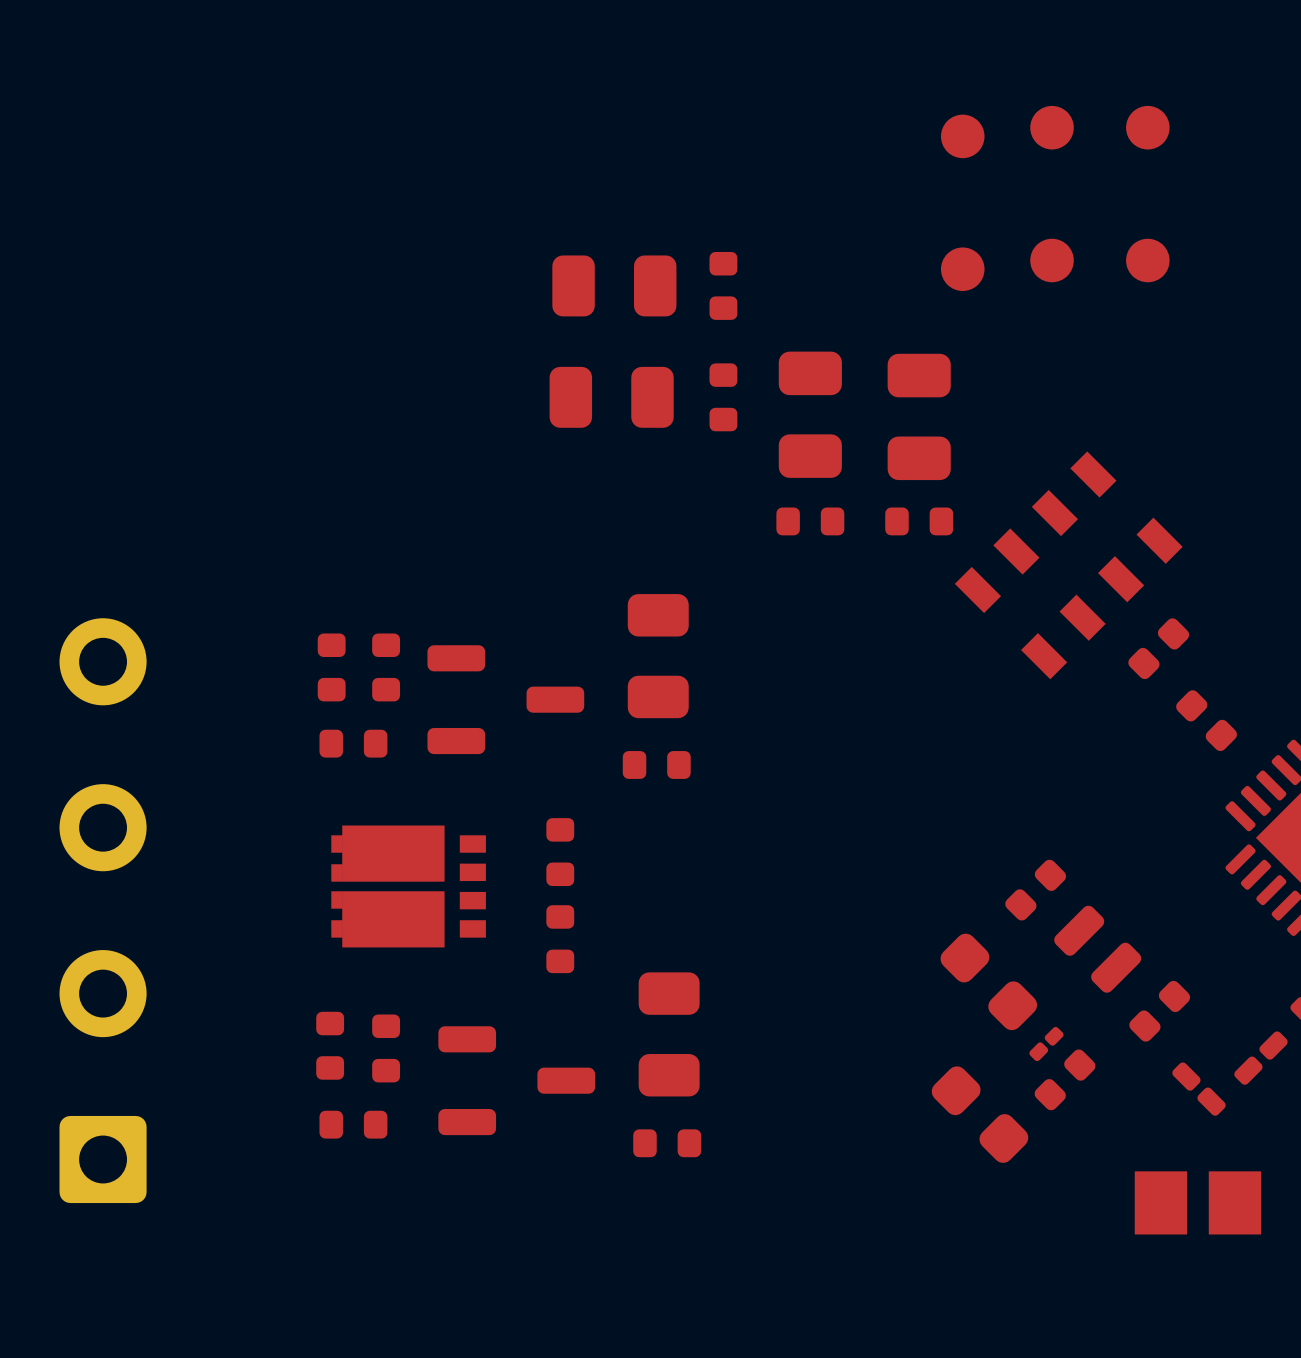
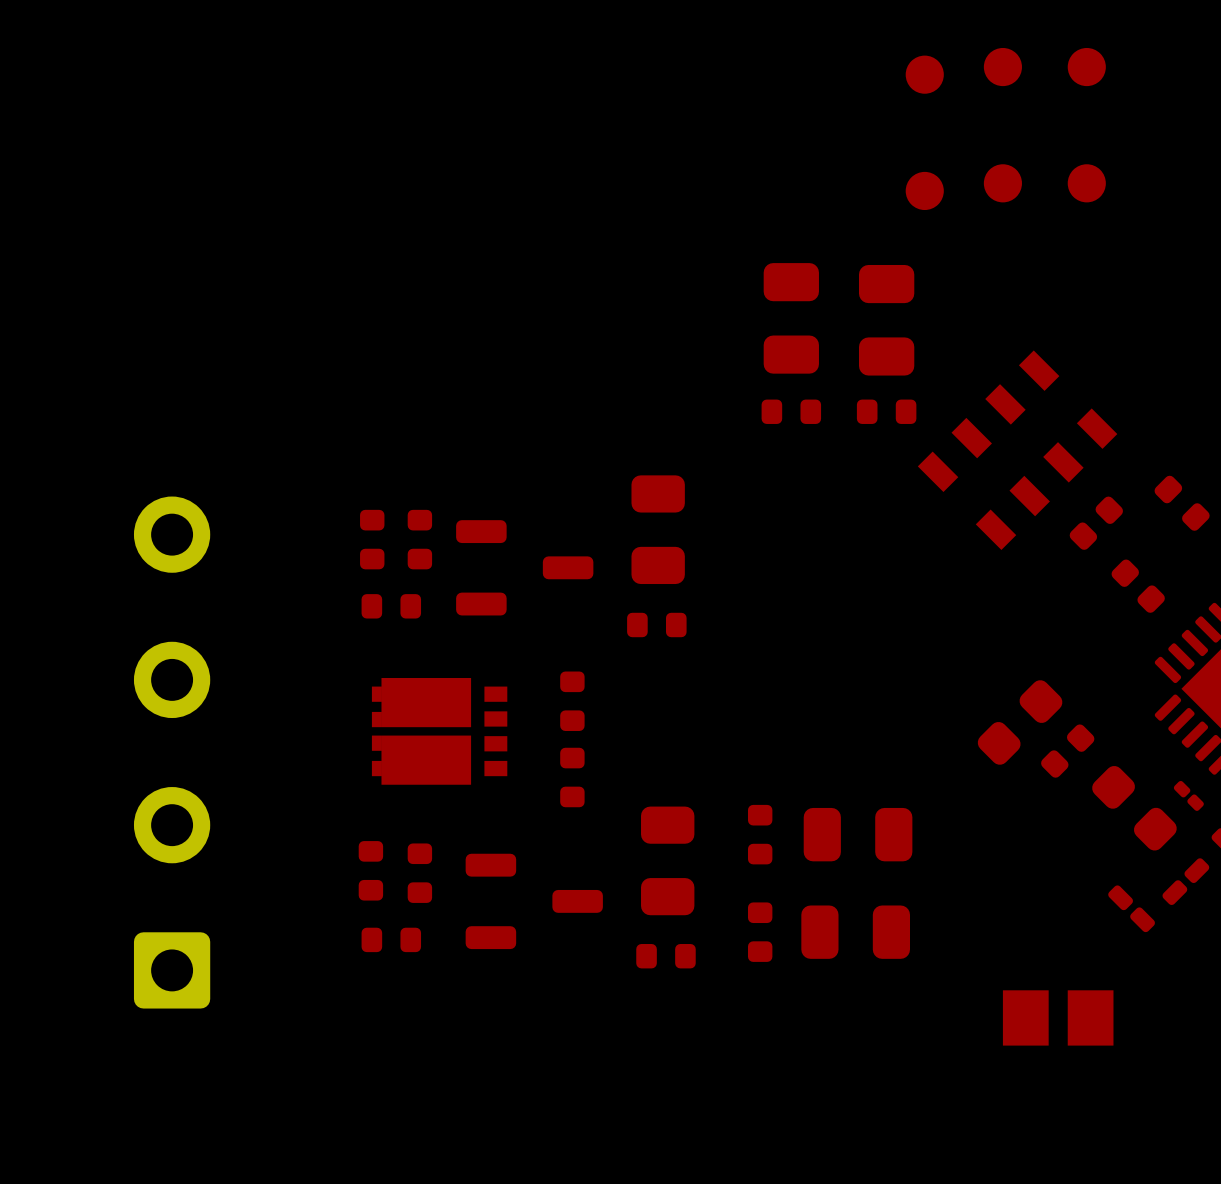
part: (614, 285) -> none
part: (723, 285) -> none
part: (611, 397) -> none
part: (723, 397) -> none
part: none -> (1182, 503)
part: none -> (1020, 722)
part: (1035, 890) -> none
part: none -> (1067, 751)
part: (1097, 949) -> none
part: none -> (1134, 808)
part: (988, 981) -> none
part: none -> (760, 834)
part: none -> (858, 834)
part: (1159, 1011) -> none
part rotation: 0° (1046, 1044) -> 90° clockwise (1188, 795)
part position: (1046, 1044) -> (1188, 795)
part: (1065, 1079) -> none
part: (980, 1114) -> none
part: none -> (760, 932)
part: none -> (855, 932)
part position: (1197, 1202) -> (1058, 1017)

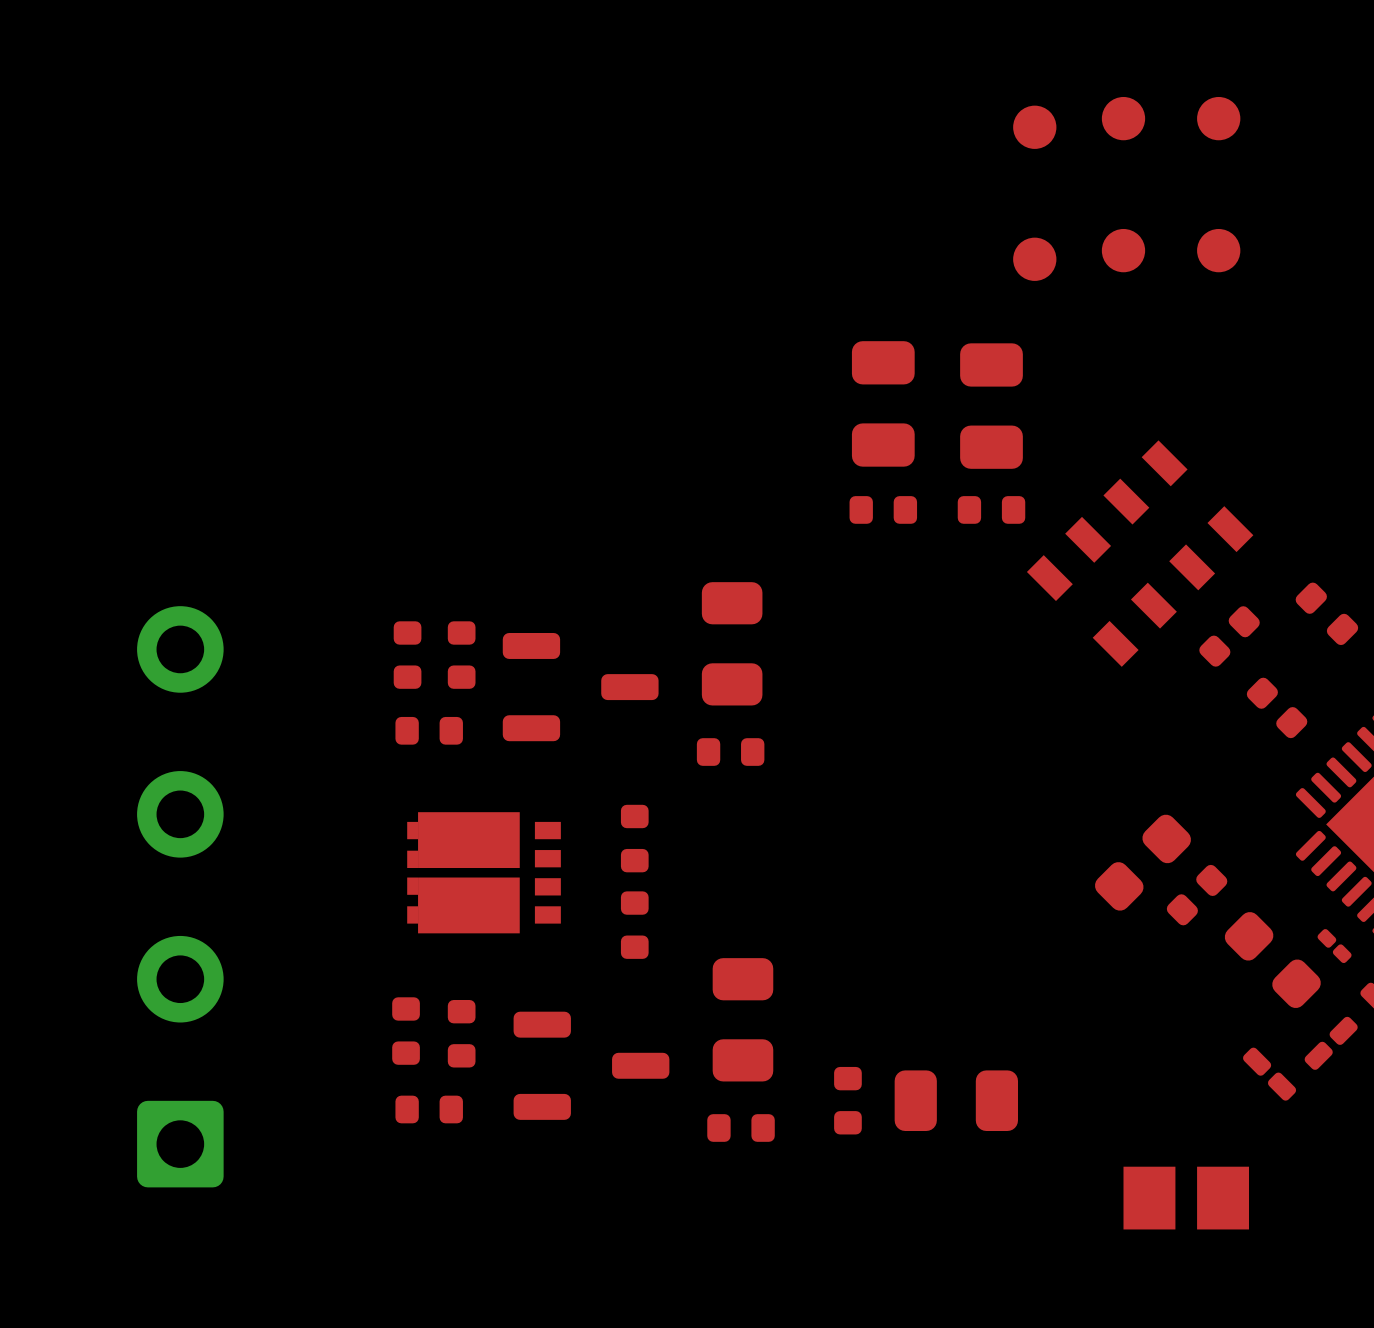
part: (760, 834) -> none
part: (858, 834) -> none

